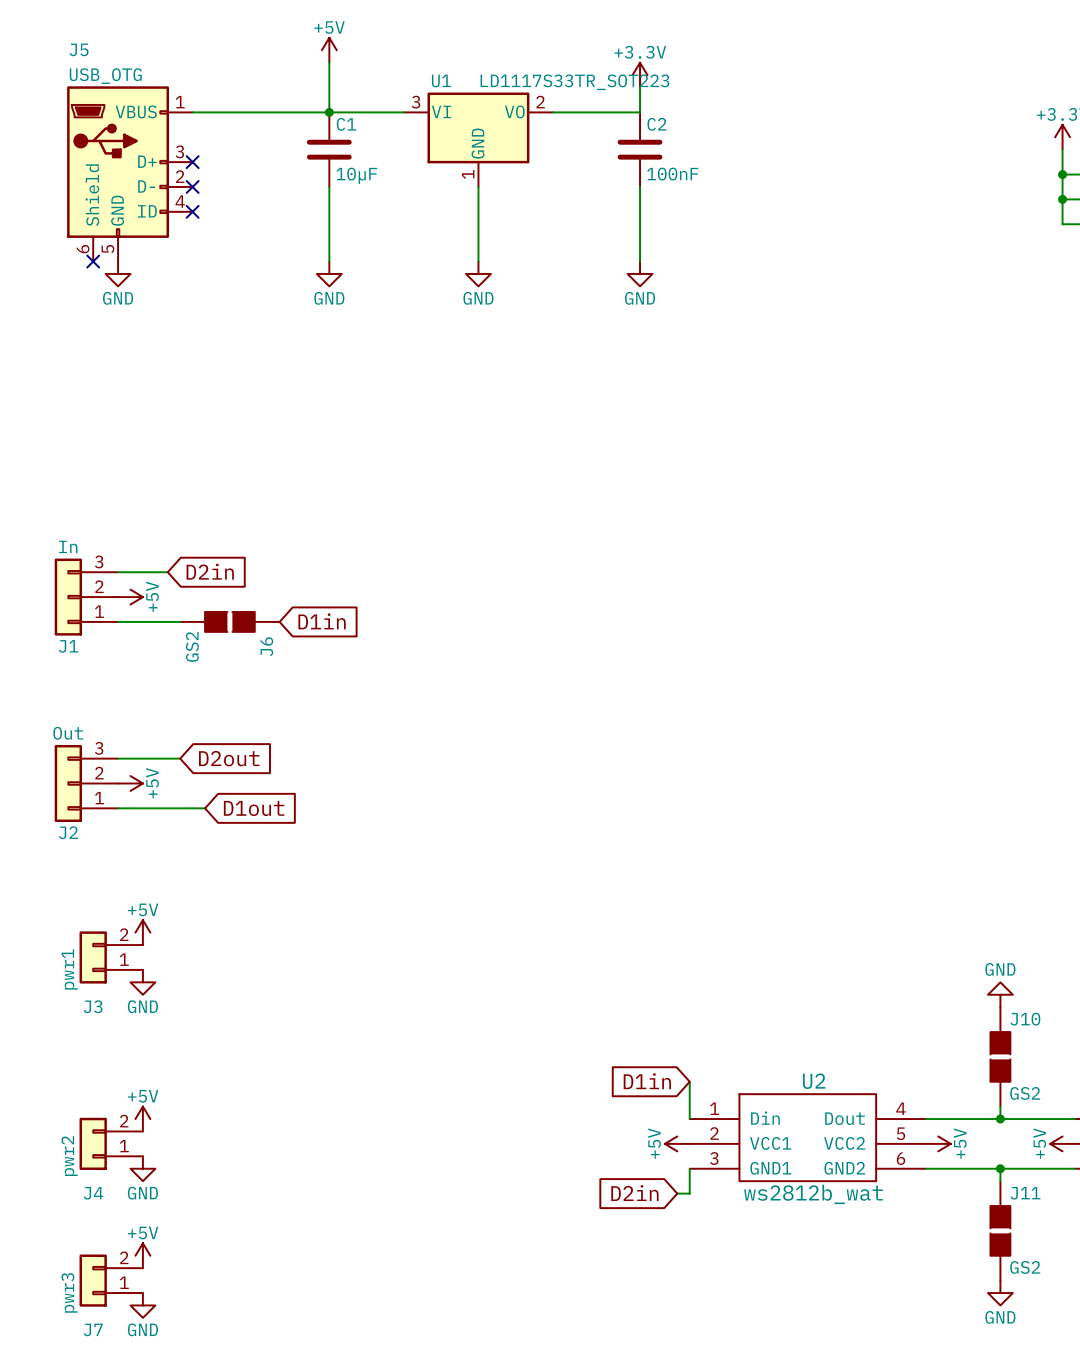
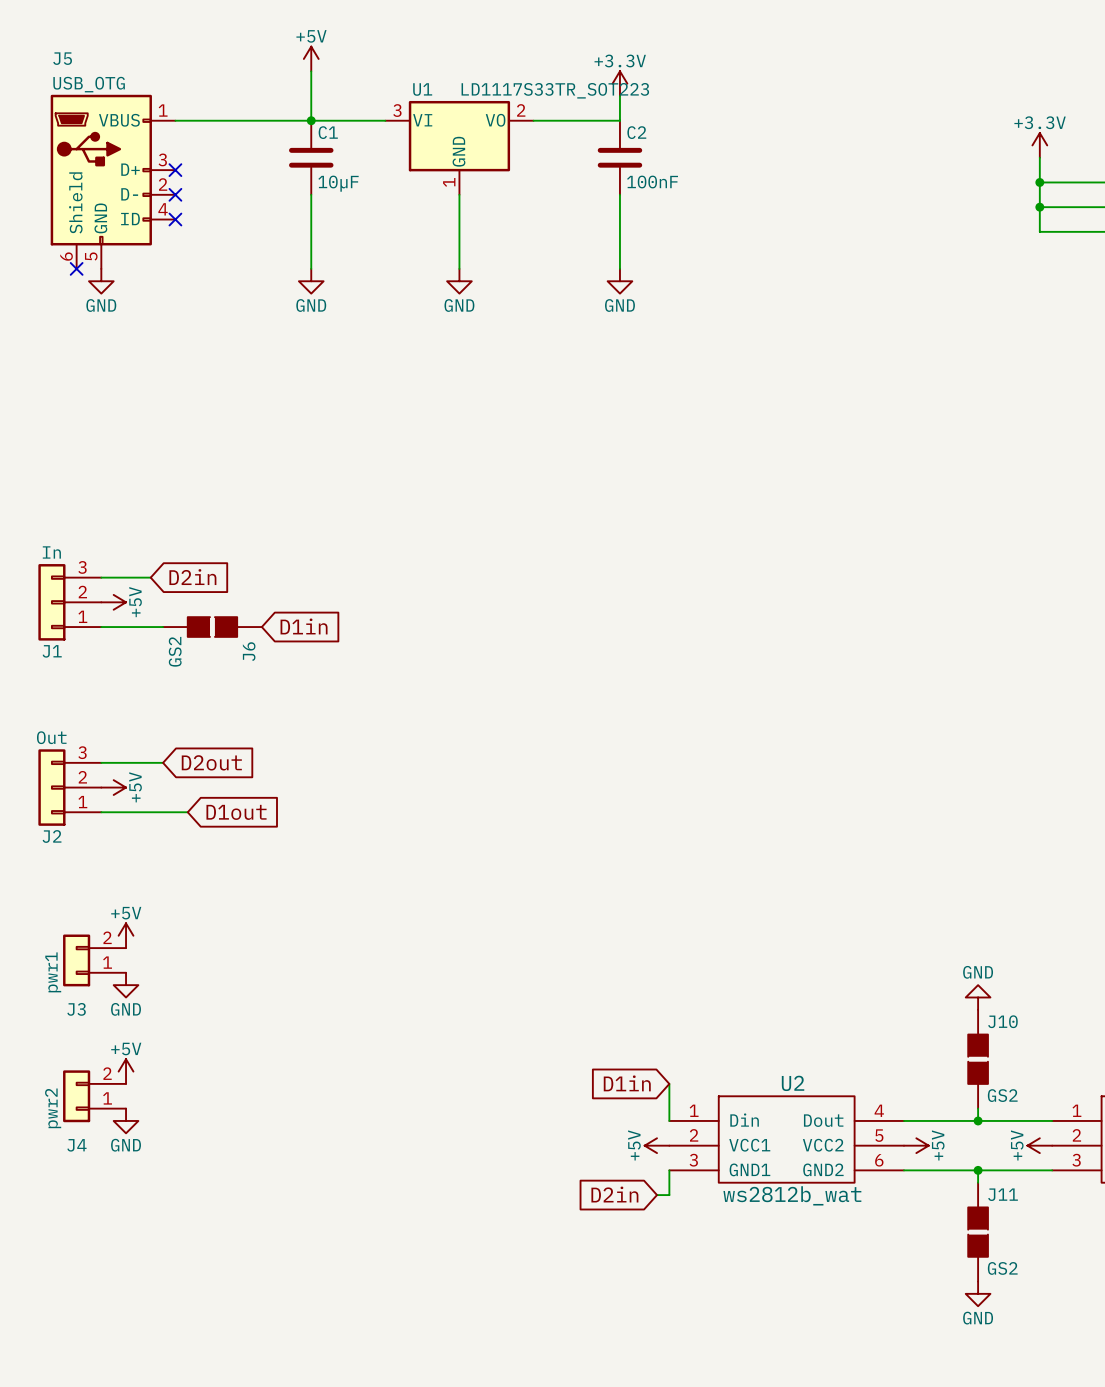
power symbol: +5V (142, 1119) -> GND (126, 1120)
J4 position: (111, 1143) -> (94, 1096)
power symbol: GND (142, 1168) -> none
power symbol position: +5V (142, 1255) -> +5V (126, 1071)
J7: pwr3 (111, 1280) -> none
power symbol: GND (142, 1305) -> none

